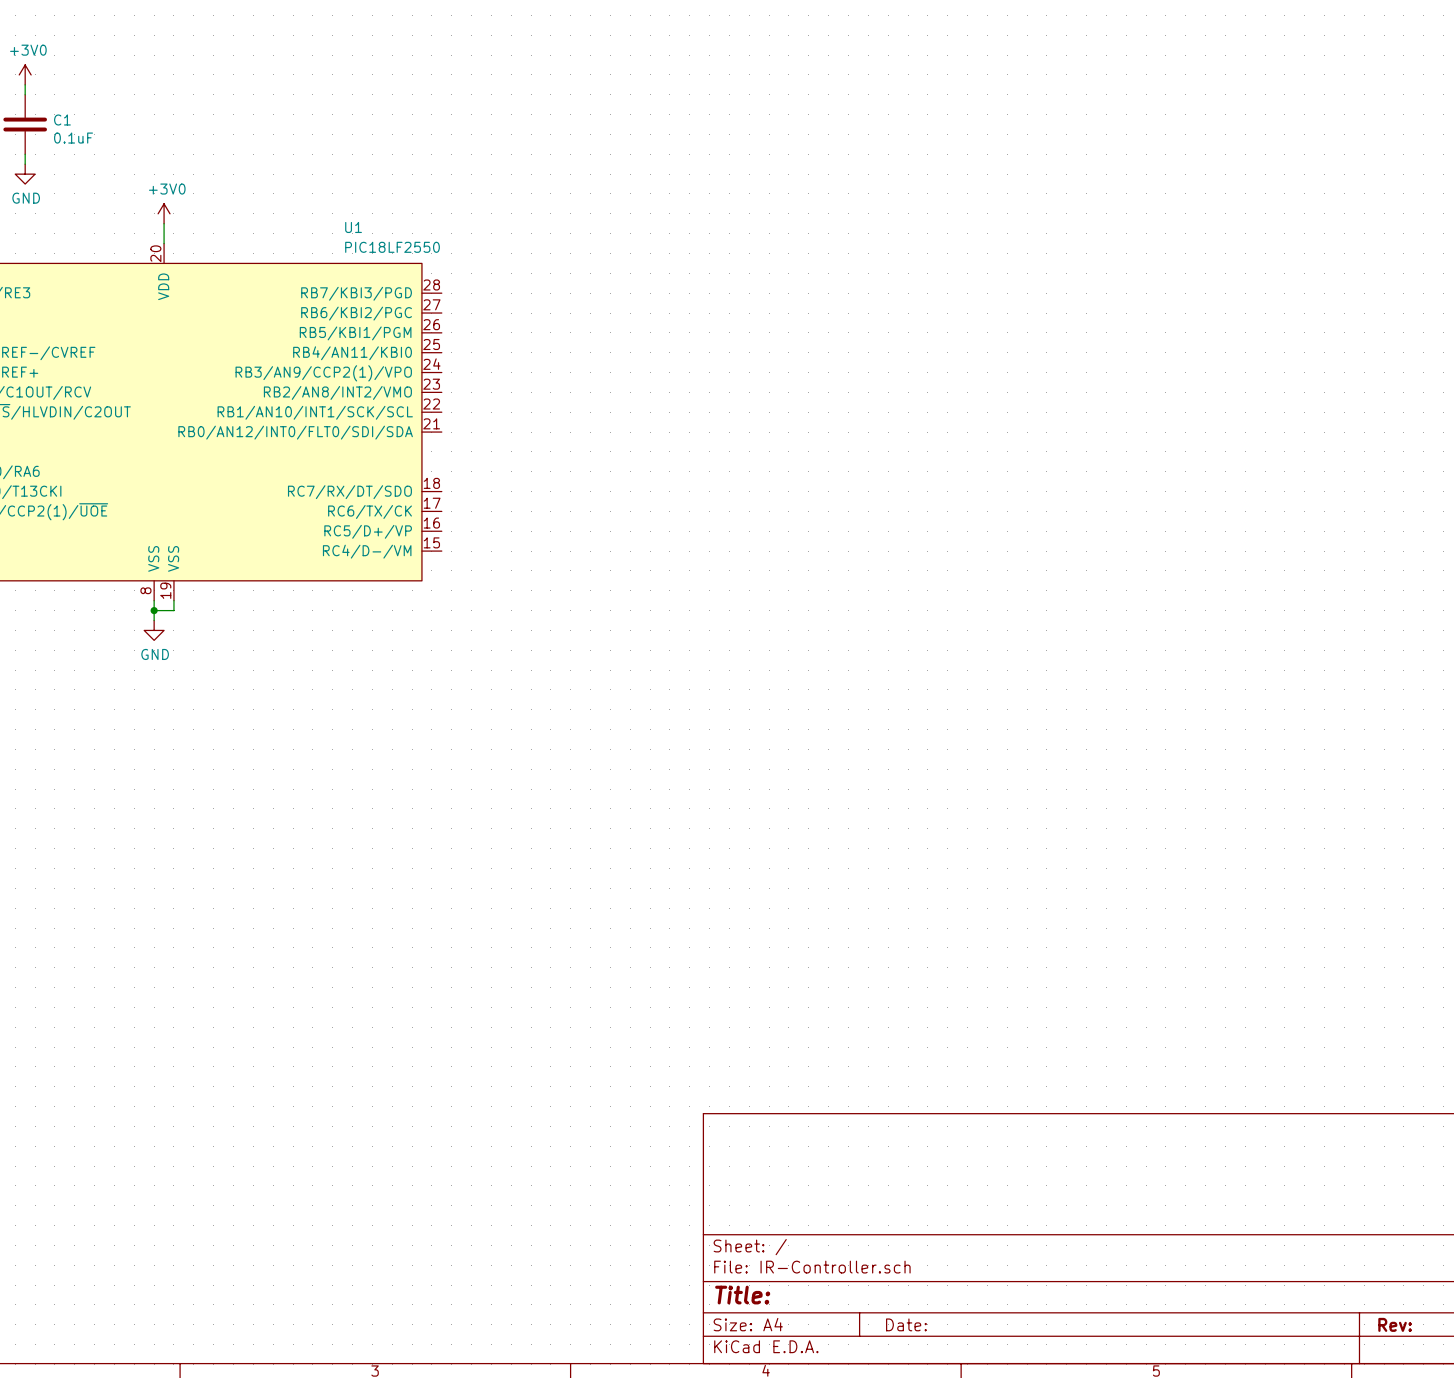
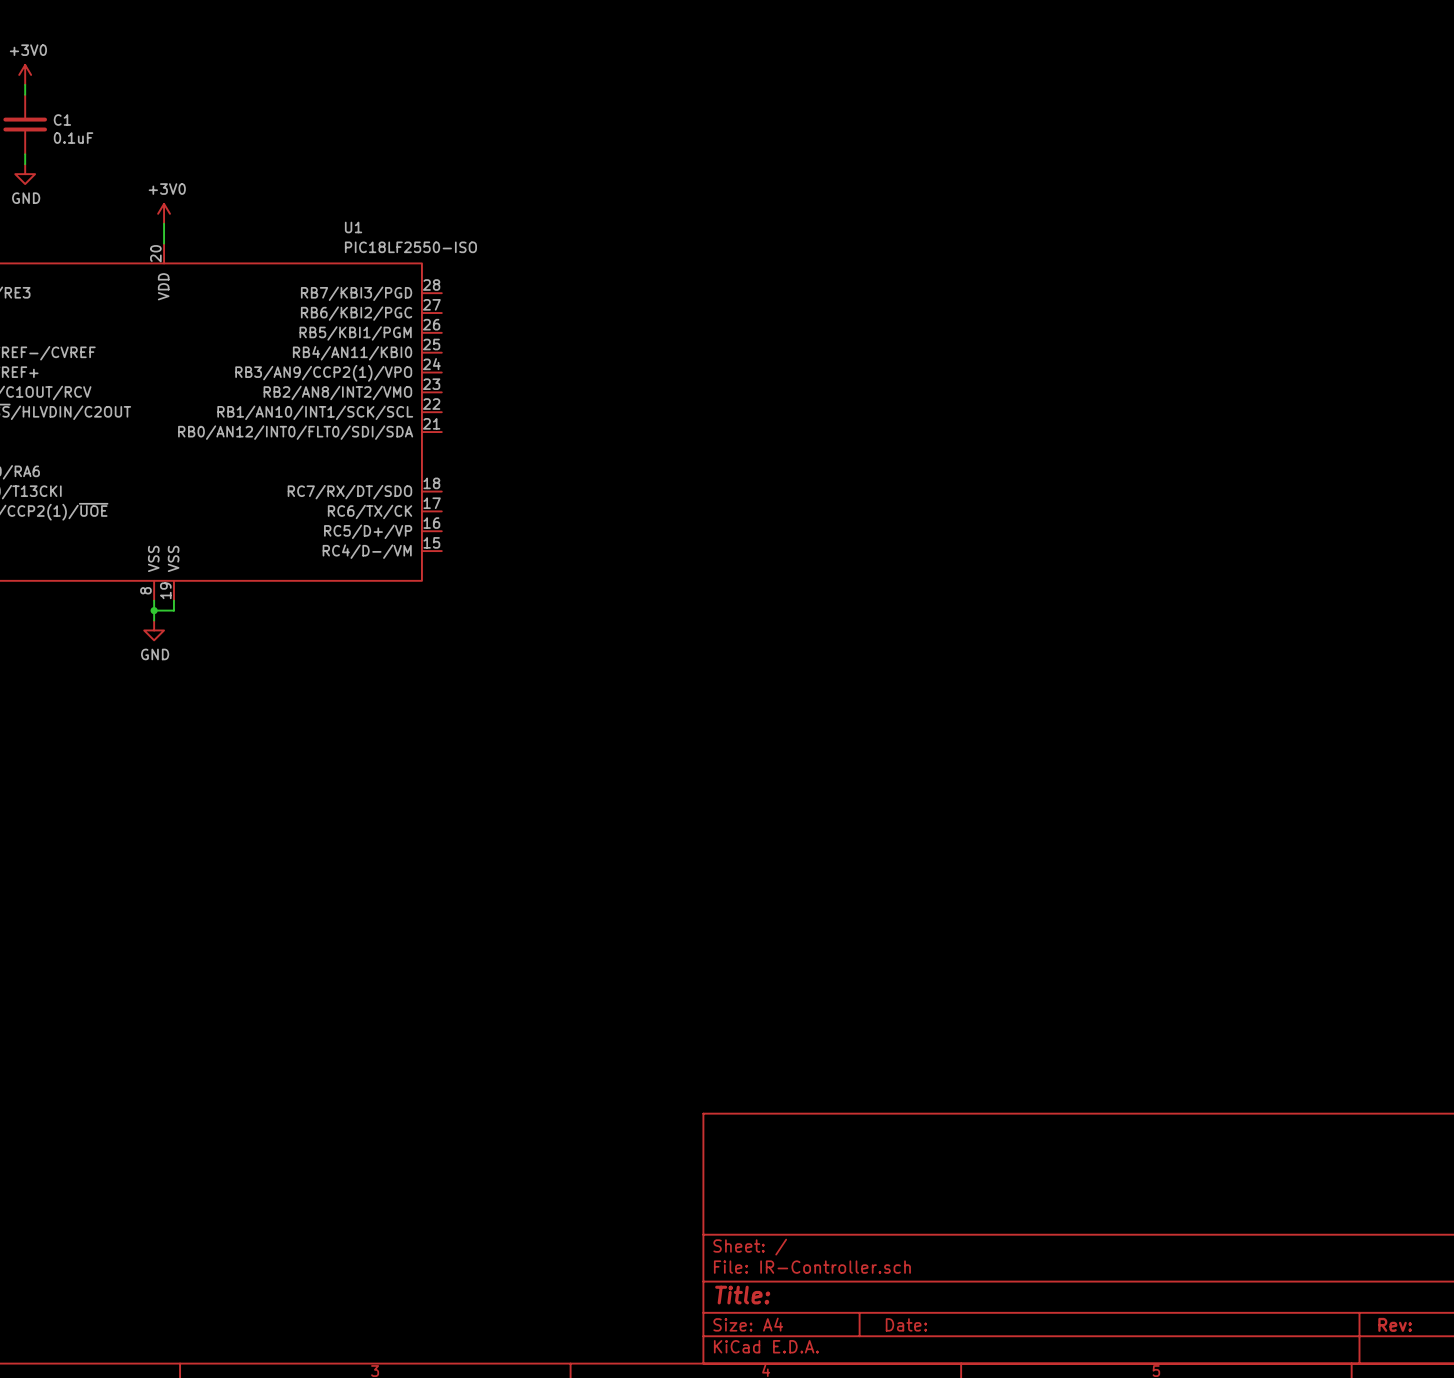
U1 value: PIC18LF2550 (392, 247) -> PIC18LF2550-ISO (410, 247)

